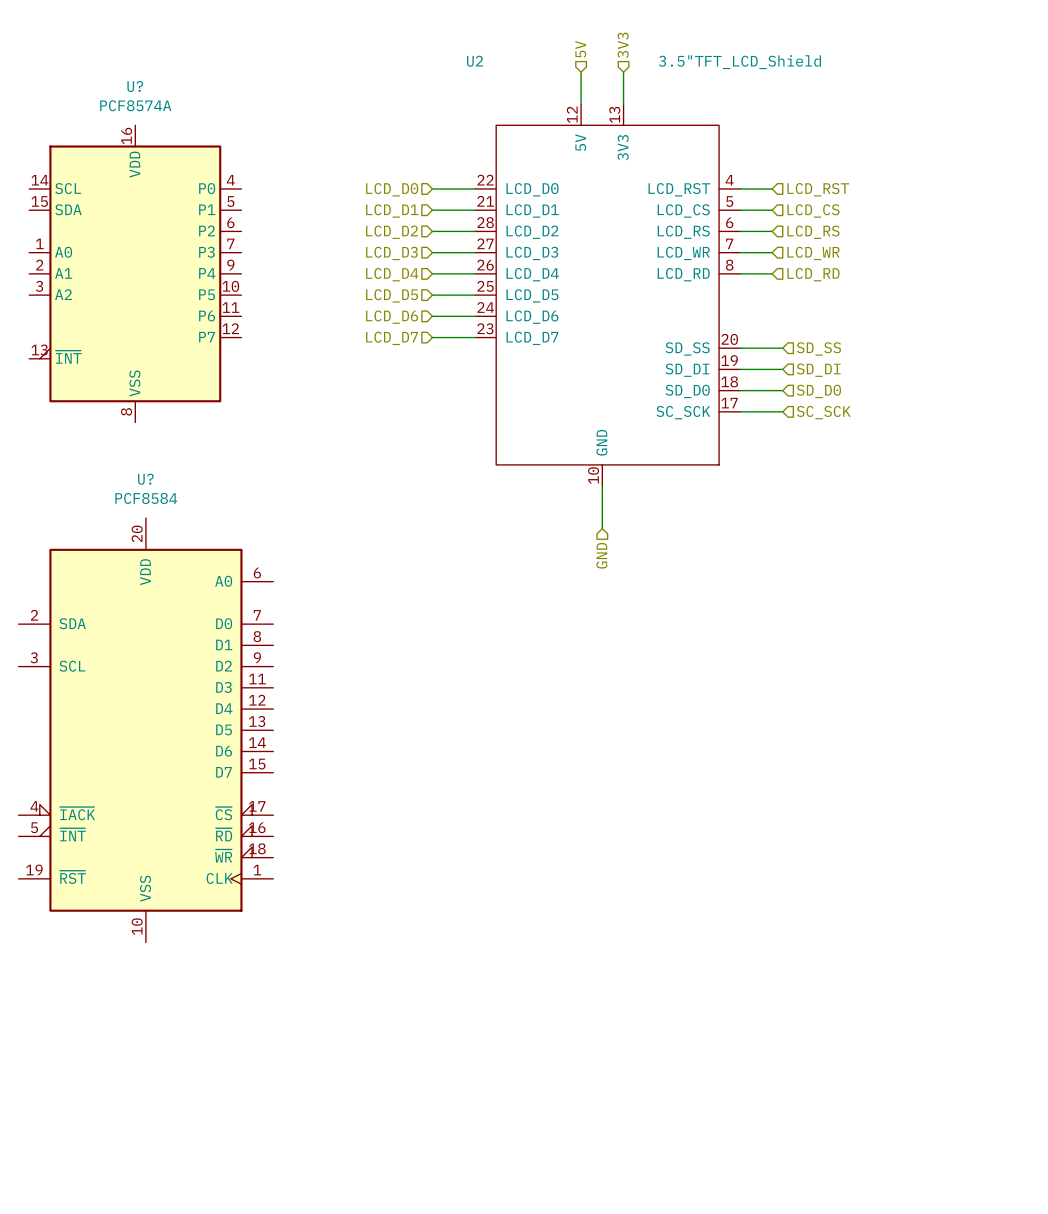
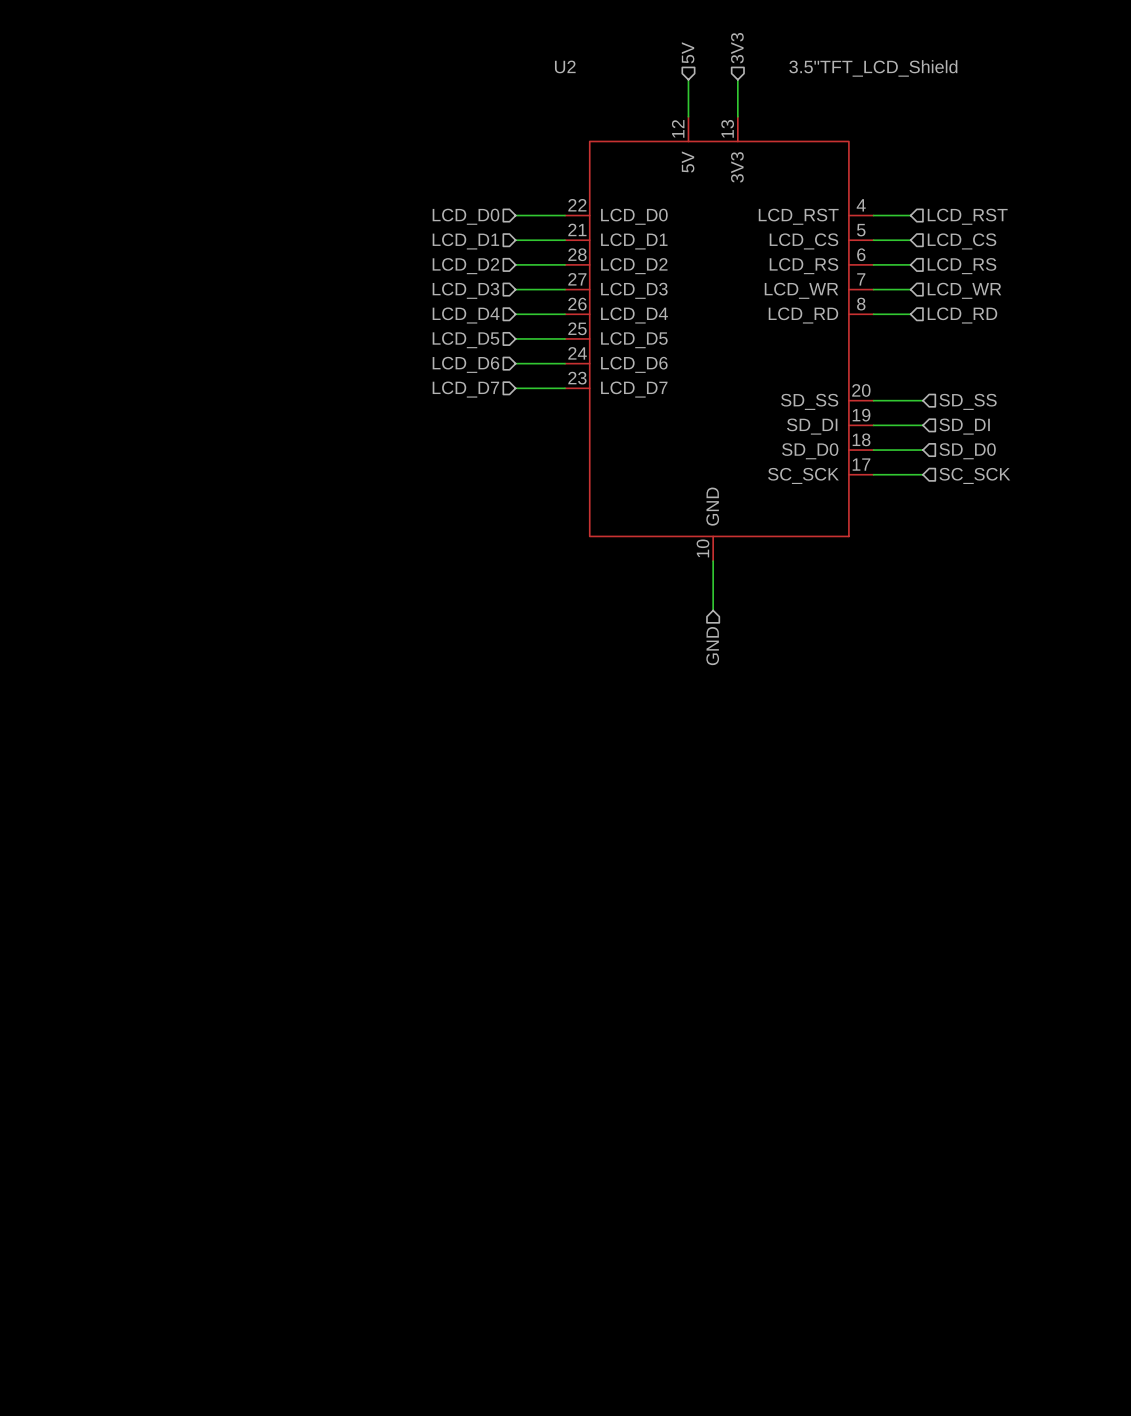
U?: PCF8574A (135, 273) -> none
U?: PCF8584 (145, 730) -> none

